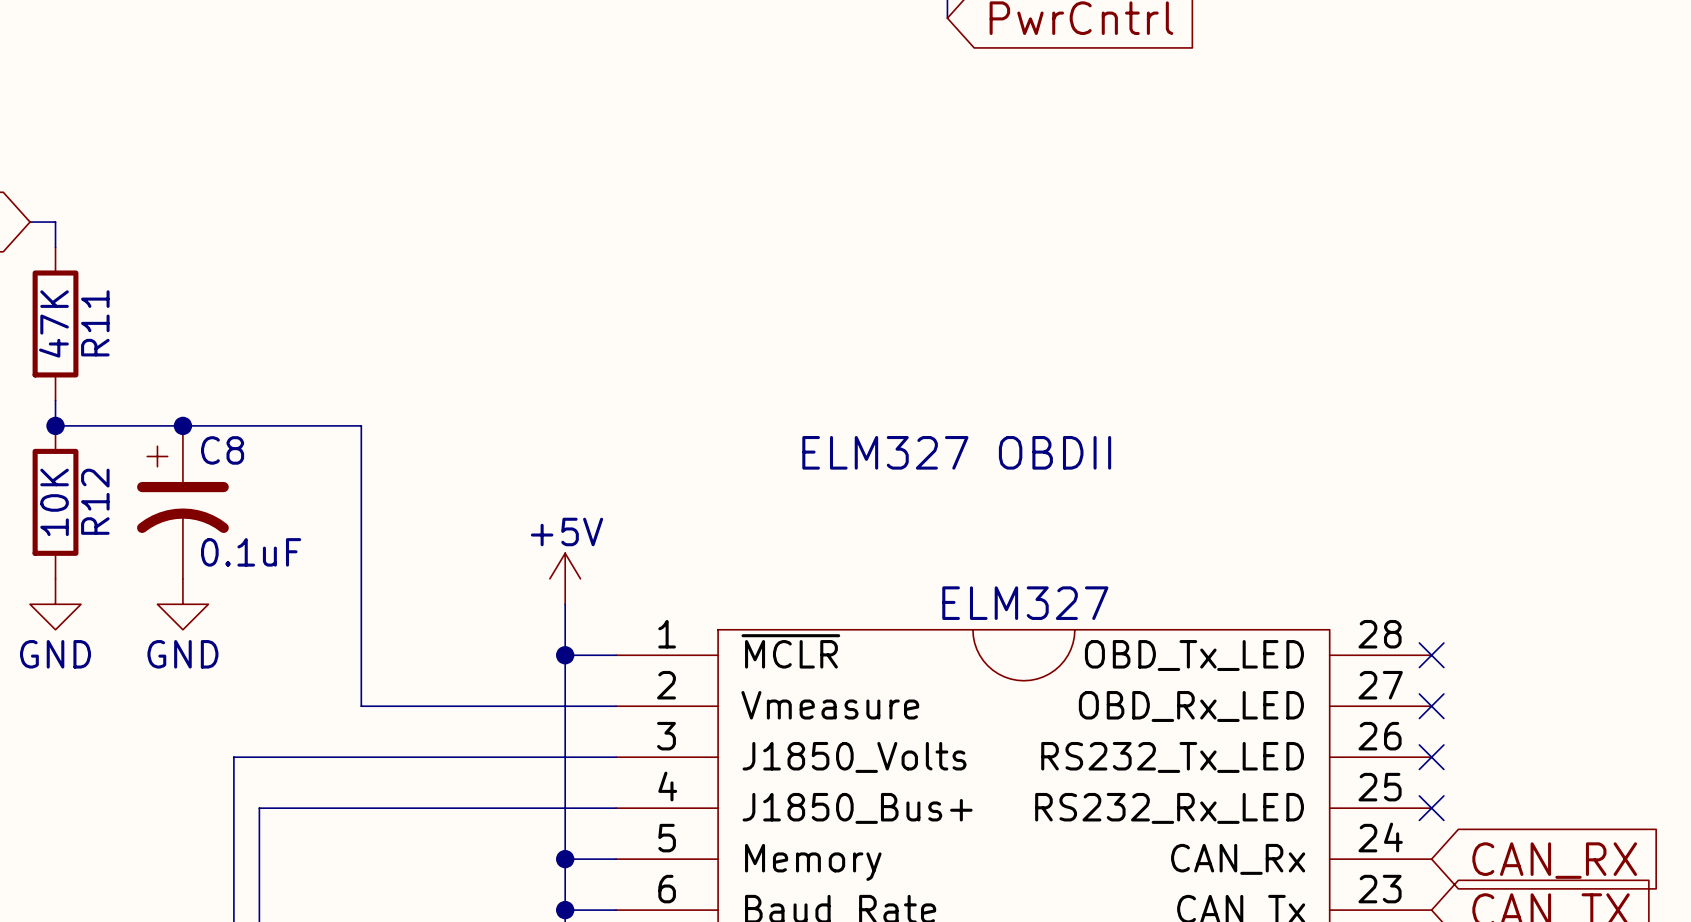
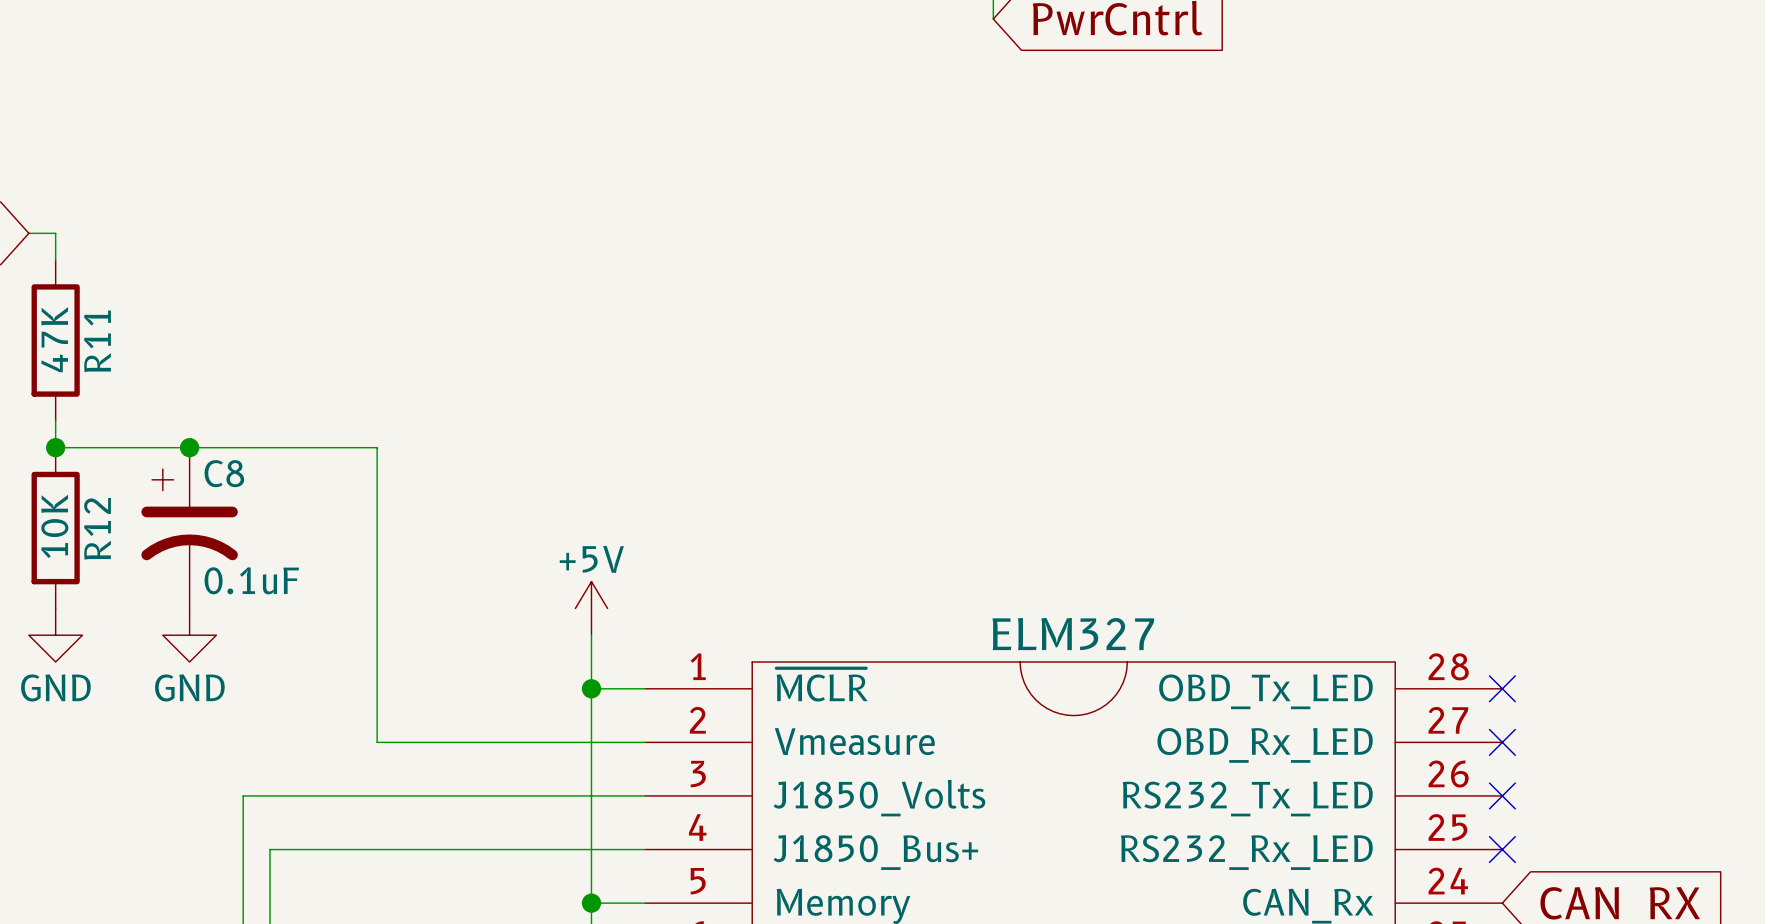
text: ELM327 OBDII (956, 452) -> none

